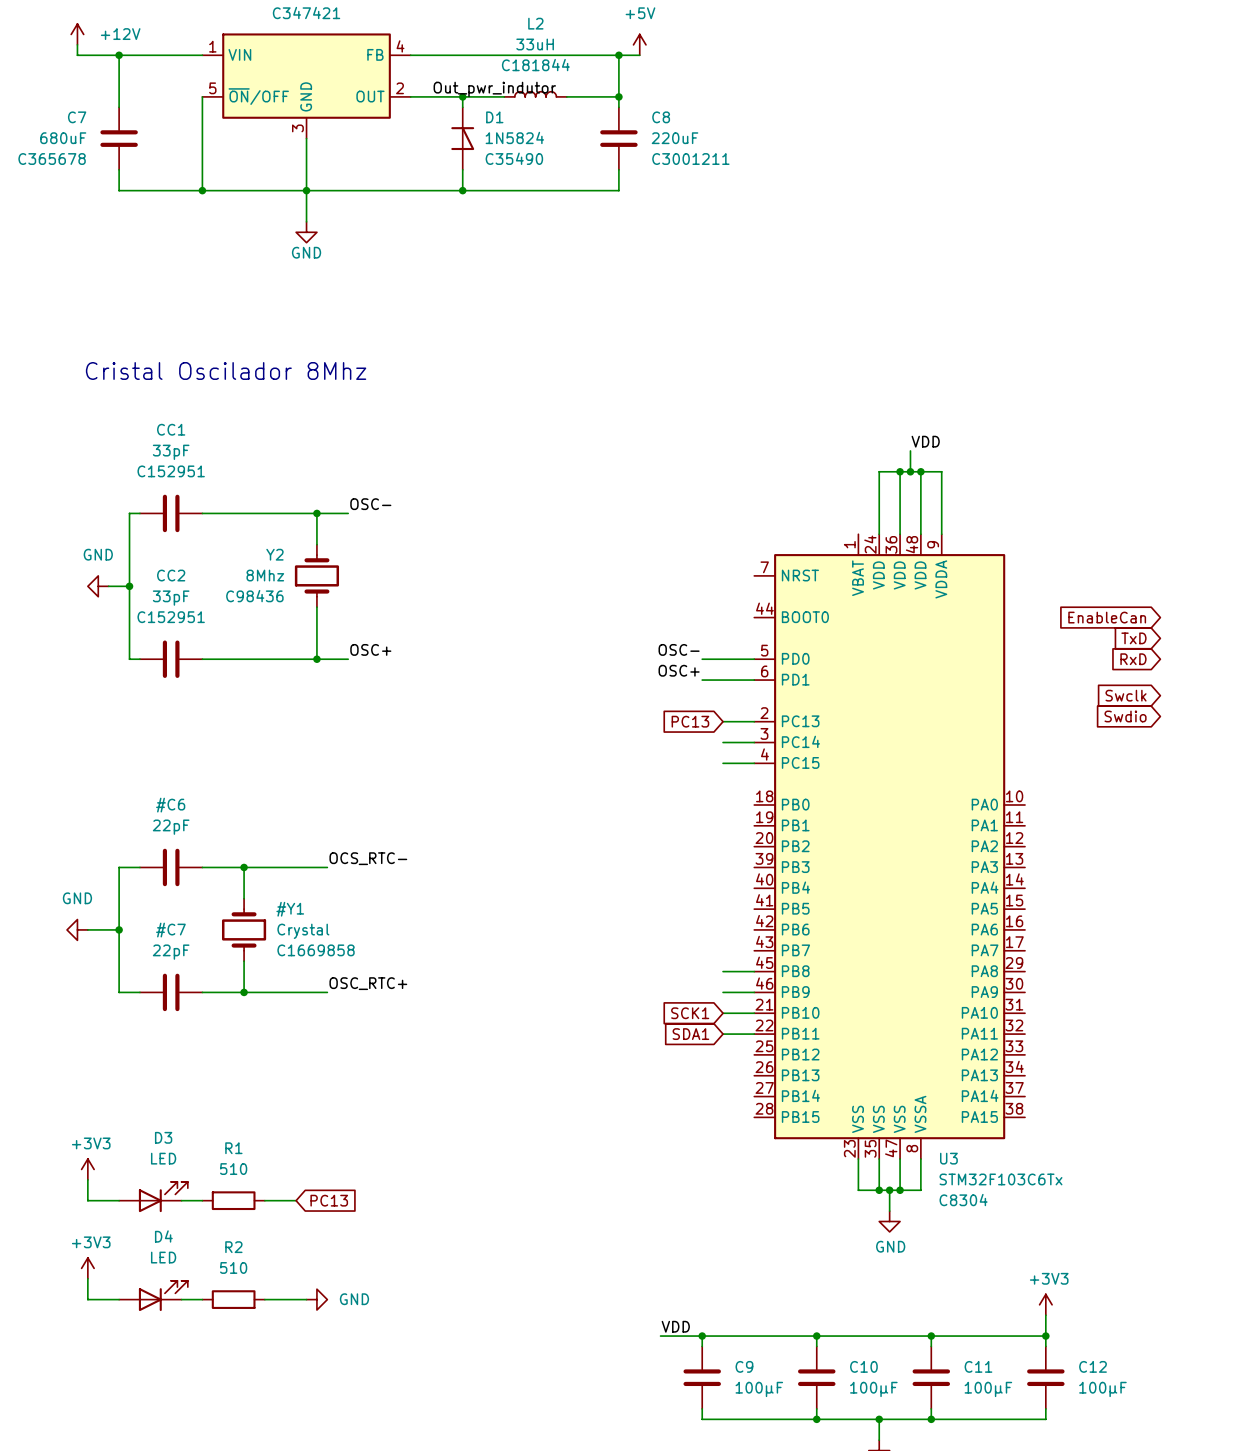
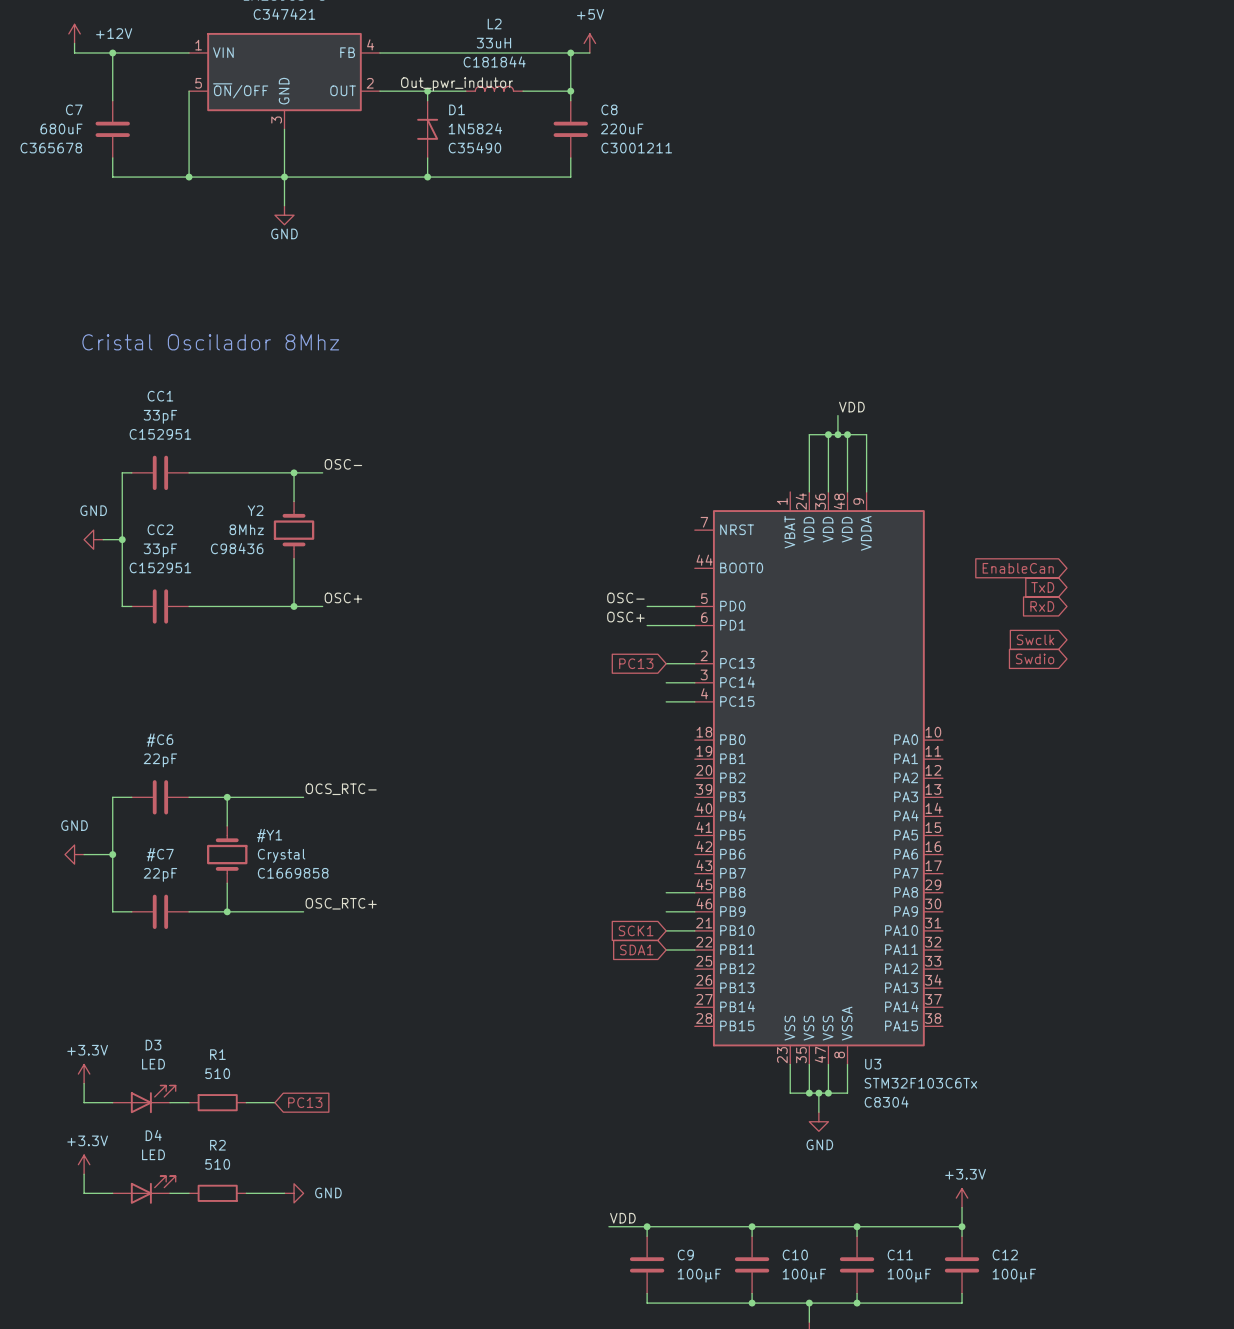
power symbol: +3V3 (87, 1169) -> +3.3V (84, 1074)
power symbol: +3V3 (87, 1268) -> +3.3V (84, 1164)
power symbol: +3V3 (1045, 1304) -> +3.3V (962, 1198)

